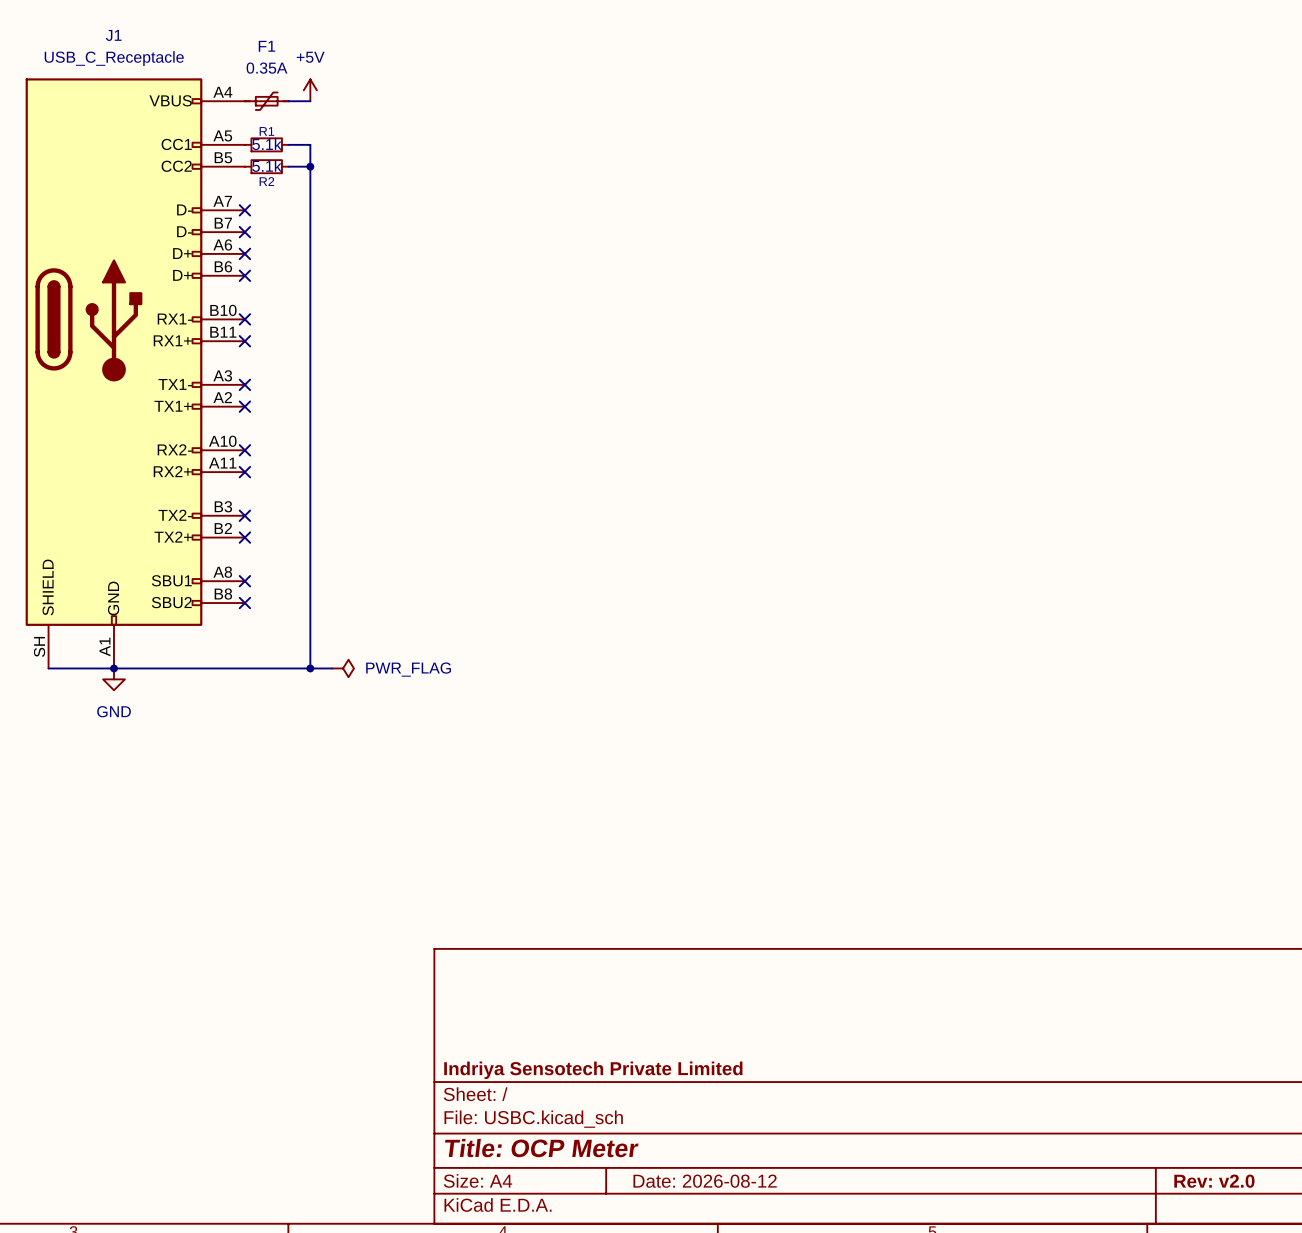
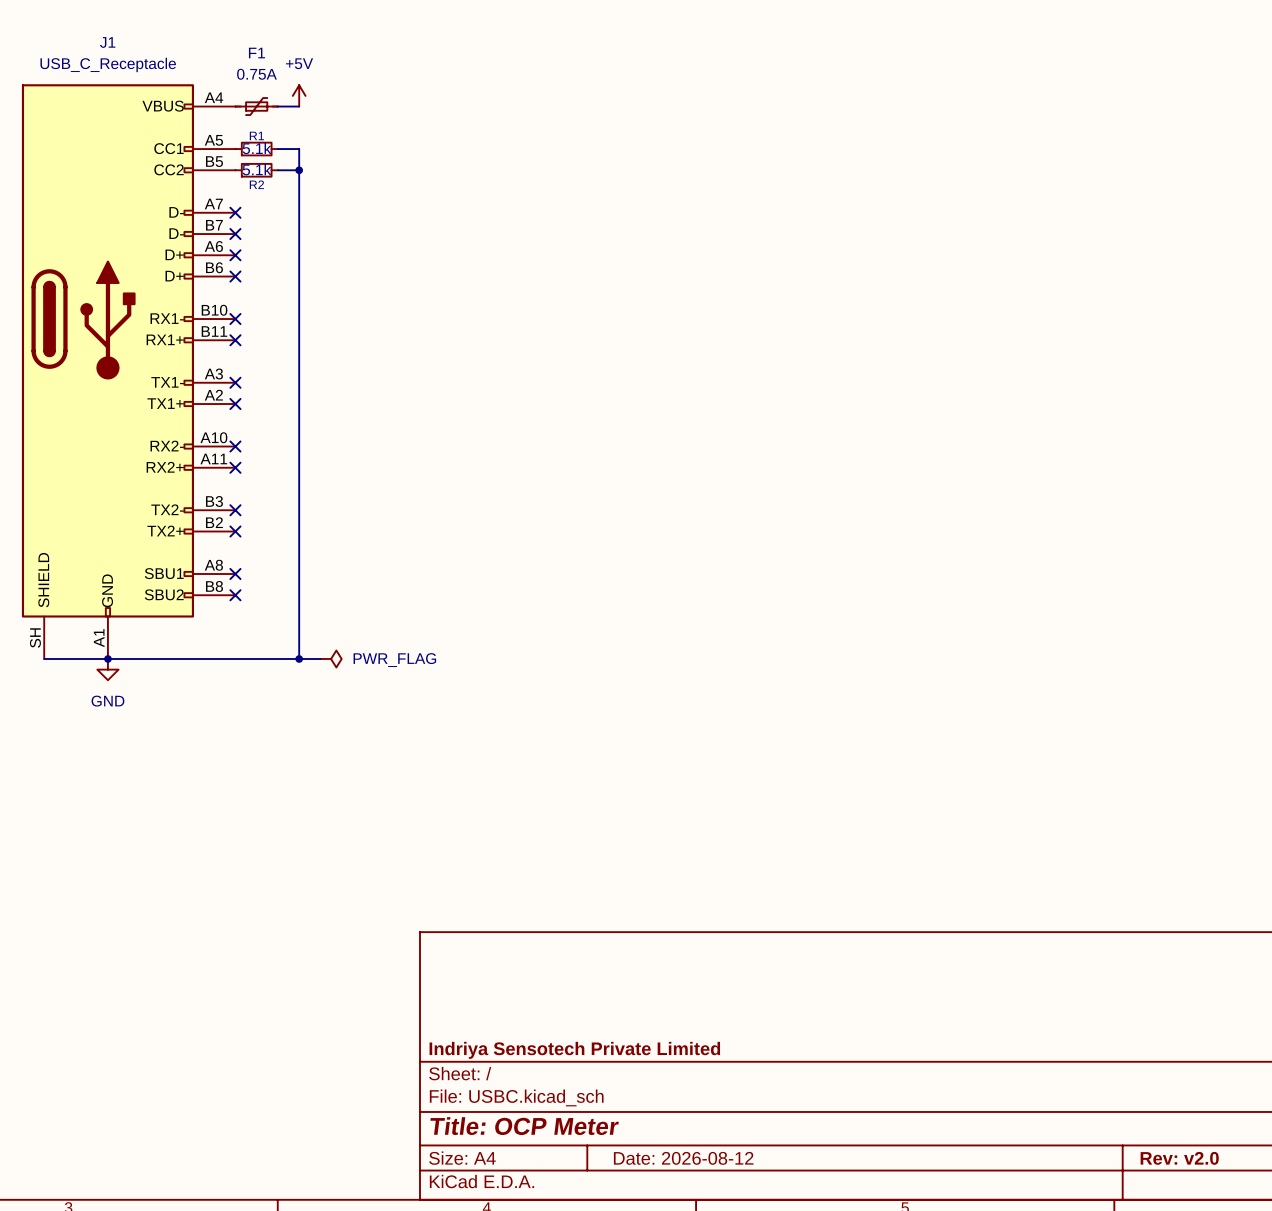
F1 value: 0.35A (267, 68) -> 0.75A (256, 74)

